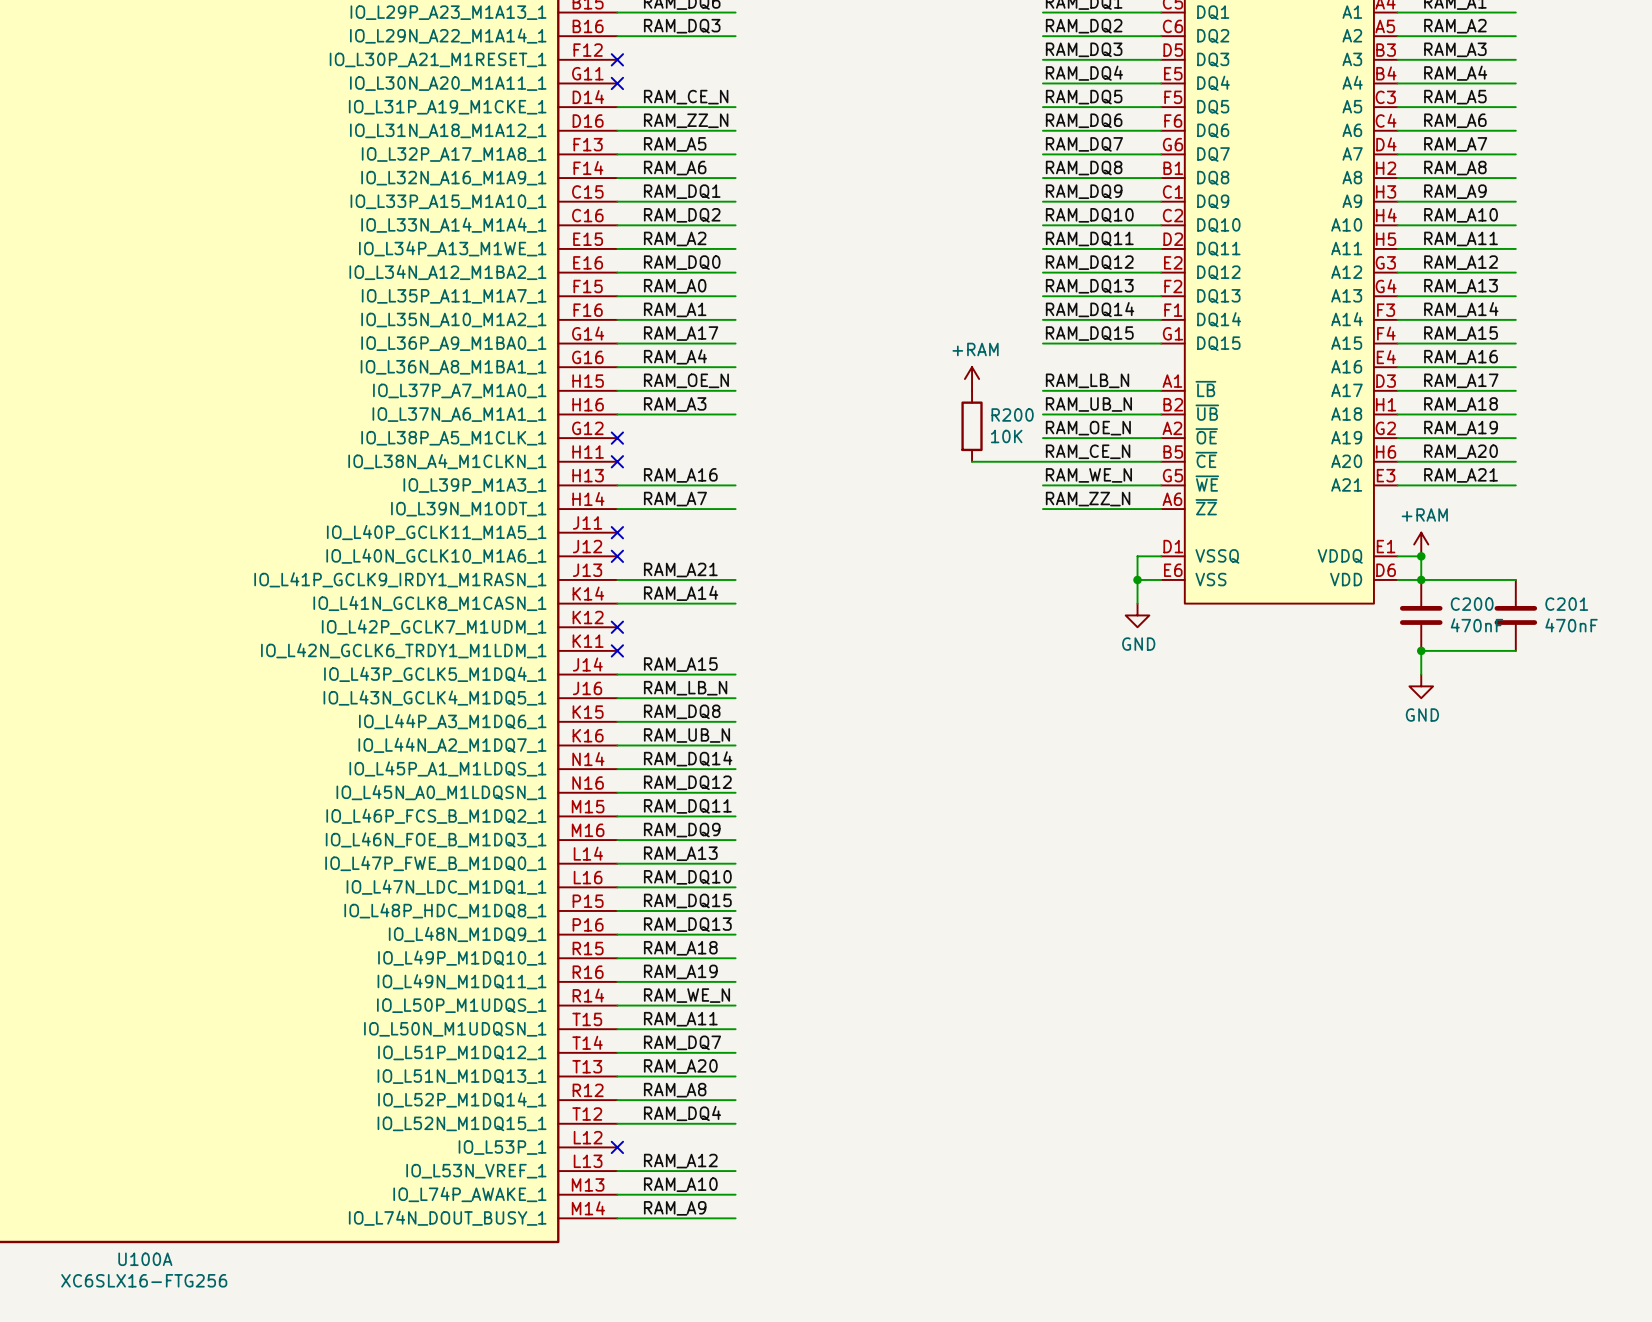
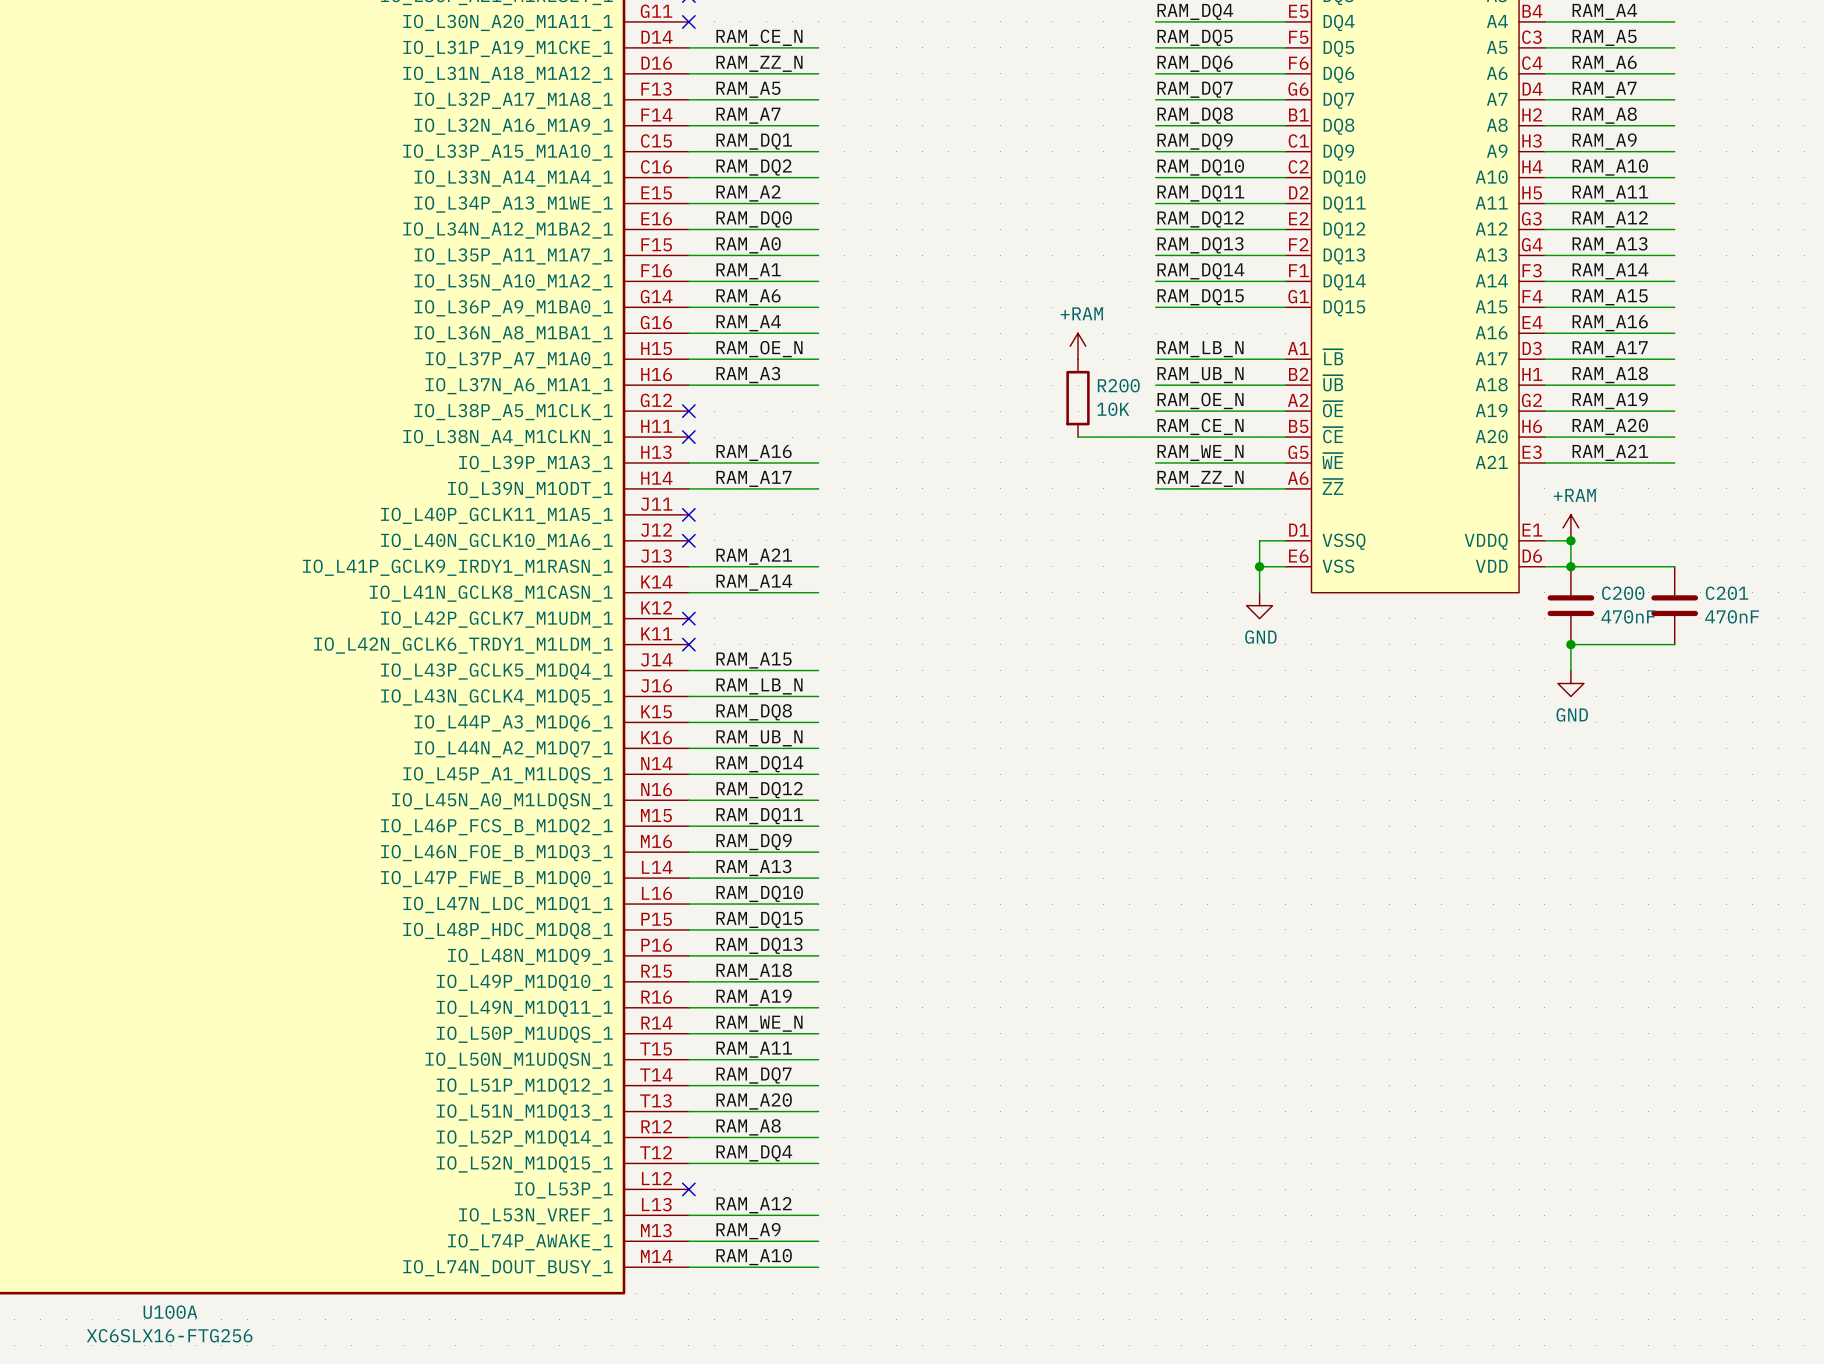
label: RAM_A6 (675, 168) -> RAM_A7 (748, 115)
label: RAM_A17 (681, 333) -> RAM_A6 (748, 297)
label: RAM_A7 (675, 499) -> RAM_A17 (754, 478)
label: RAM_A10 (680, 1184) -> RAM_A9 (748, 1231)
label: RAM_A9 (675, 1208) -> RAM_A10 (754, 1257)

